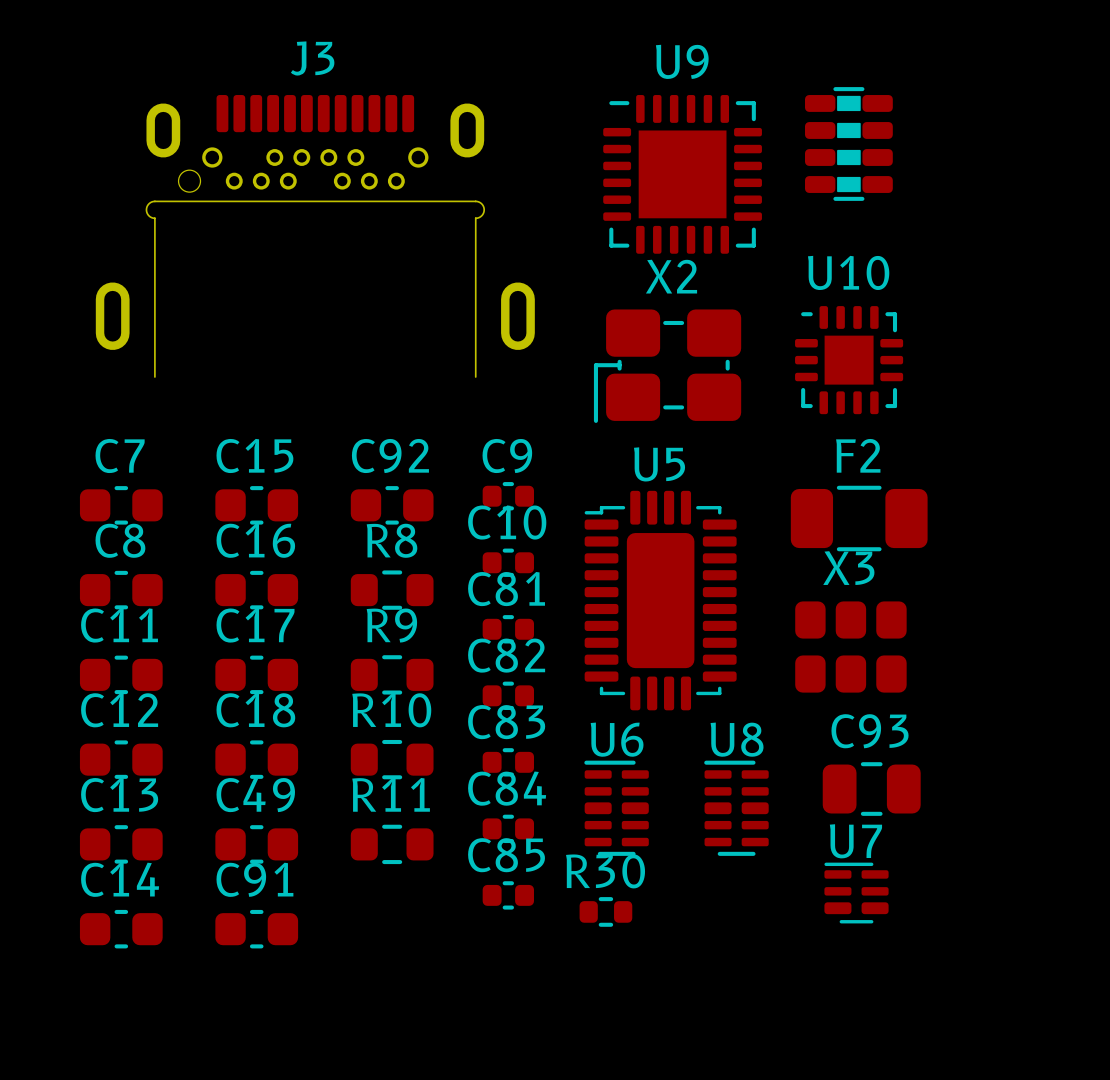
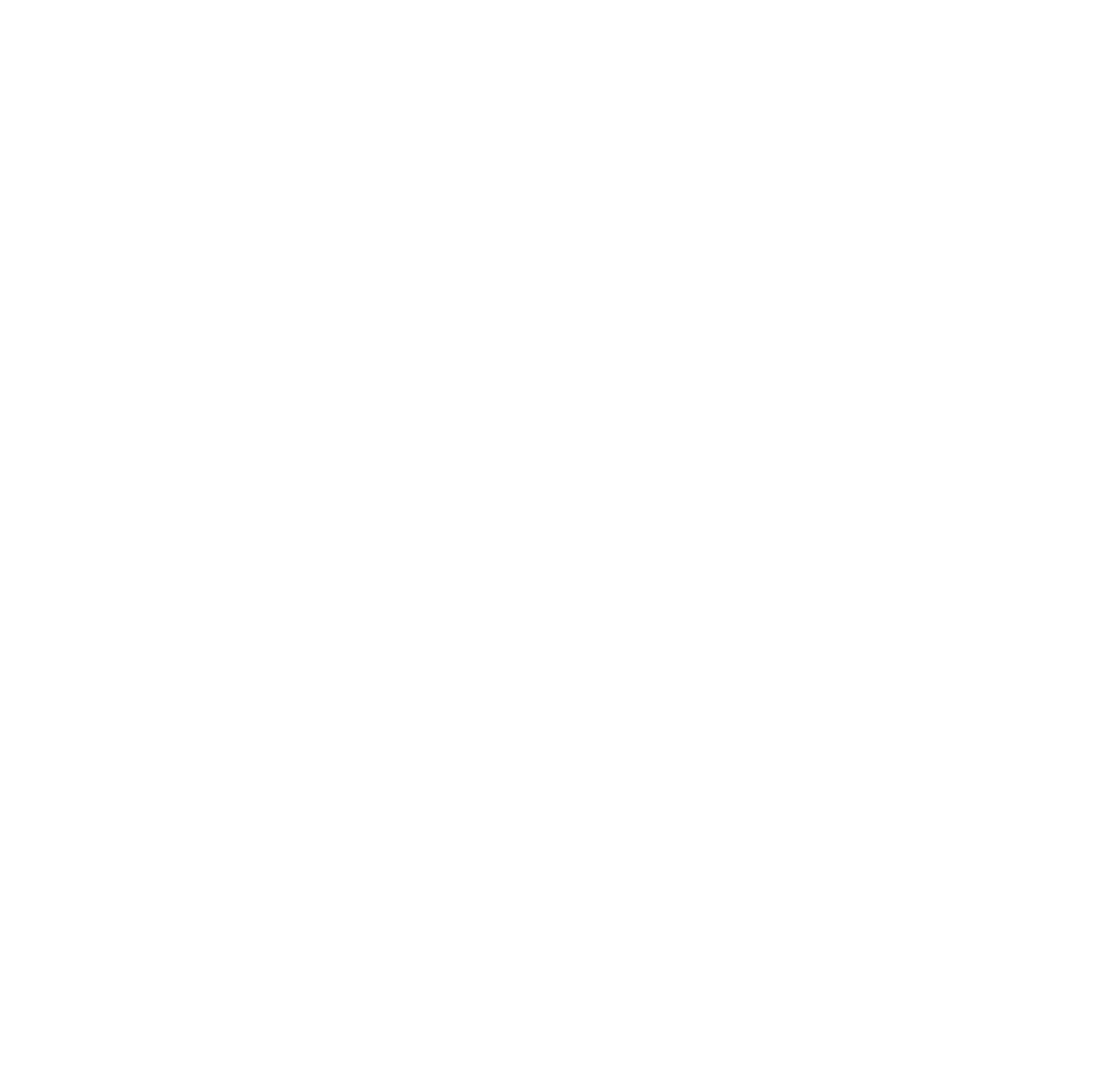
part: (848, 143) -> none
U9: (682, 174) -> none
J3: (315, 236) -> none
U10: (849, 360) -> none
X2: (667, 366) -> none
C9: (508, 496) -> none
C7: (121, 505) -> none
C15: (256, 505) -> none
C92: (392, 505) -> none
F2: (859, 518) -> none
C10: (508, 562) -> none
C8: (121, 590) -> none
C16: (256, 590) -> none
R8: (392, 590) -> none
U5: (660, 600) -> none
C81: (508, 629) -> none
X3: (850, 647) -> none
C11: (121, 674) -> none
C17: (256, 674) -> none
R9: (392, 674) -> none
C82: (508, 695) -> none
C12: (121, 759) -> none
C18: (256, 759) -> none
R10: (392, 759) -> none
C83: (508, 762) -> none
C93: (871, 789) -> none
U6: (616, 808) -> none
U8: (736, 808) -> none
C84: (508, 828) -> none
C13: (121, 844) -> none
C49: (256, 844) -> none
R11: (392, 844) -> none
U7: (856, 893) -> none
C85: (508, 895) -> none
R30: (605, 911) -> none
C14: (121, 929) -> none
C91: (256, 929) -> none

